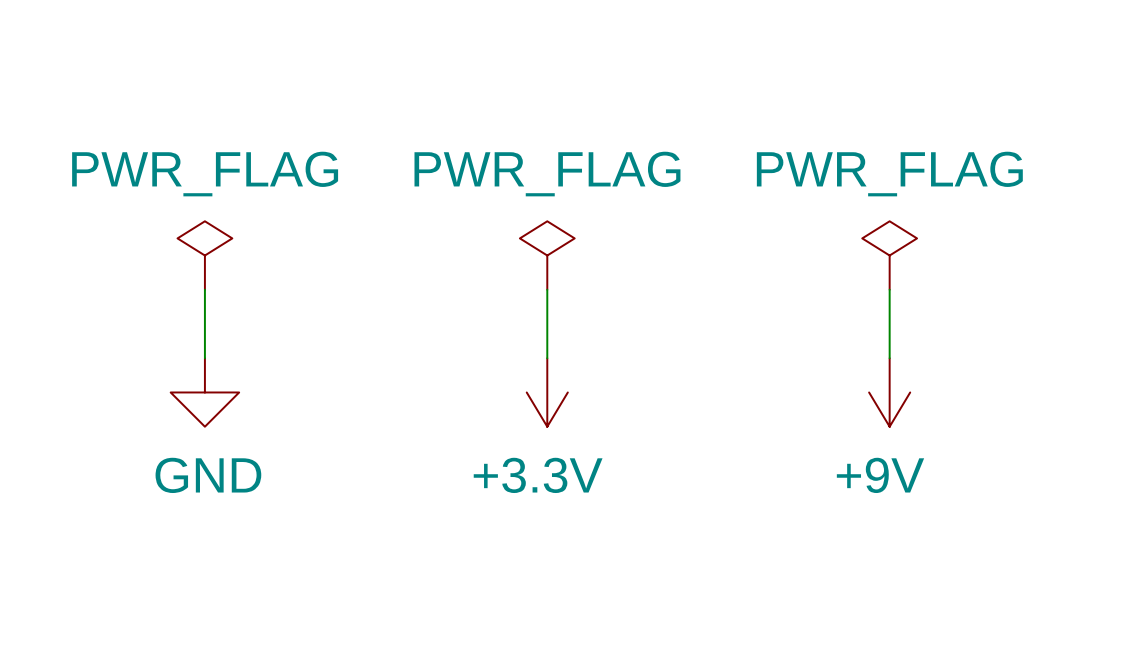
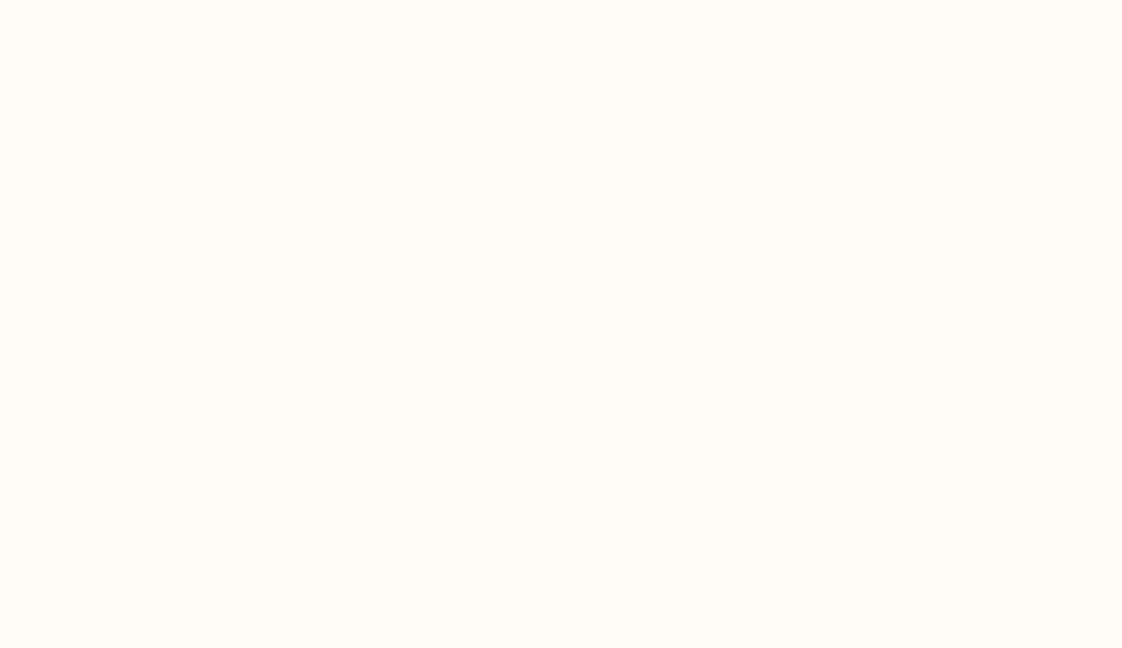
power symbol: PWR_FLAG (204, 255) -> none
power symbol: PWR_FLAG (547, 255) -> none
power symbol: PWR_FLAG (889, 255) -> none
wire: (204, 289) (204, 358) -> none
wire: (547, 289) (547, 358) -> none
wire: (889, 289) (889, 358) -> none
power symbol: GND (204, 392) -> none
power symbol: +3.3V (547, 392) -> none
power symbol: +9V (889, 392) -> none

